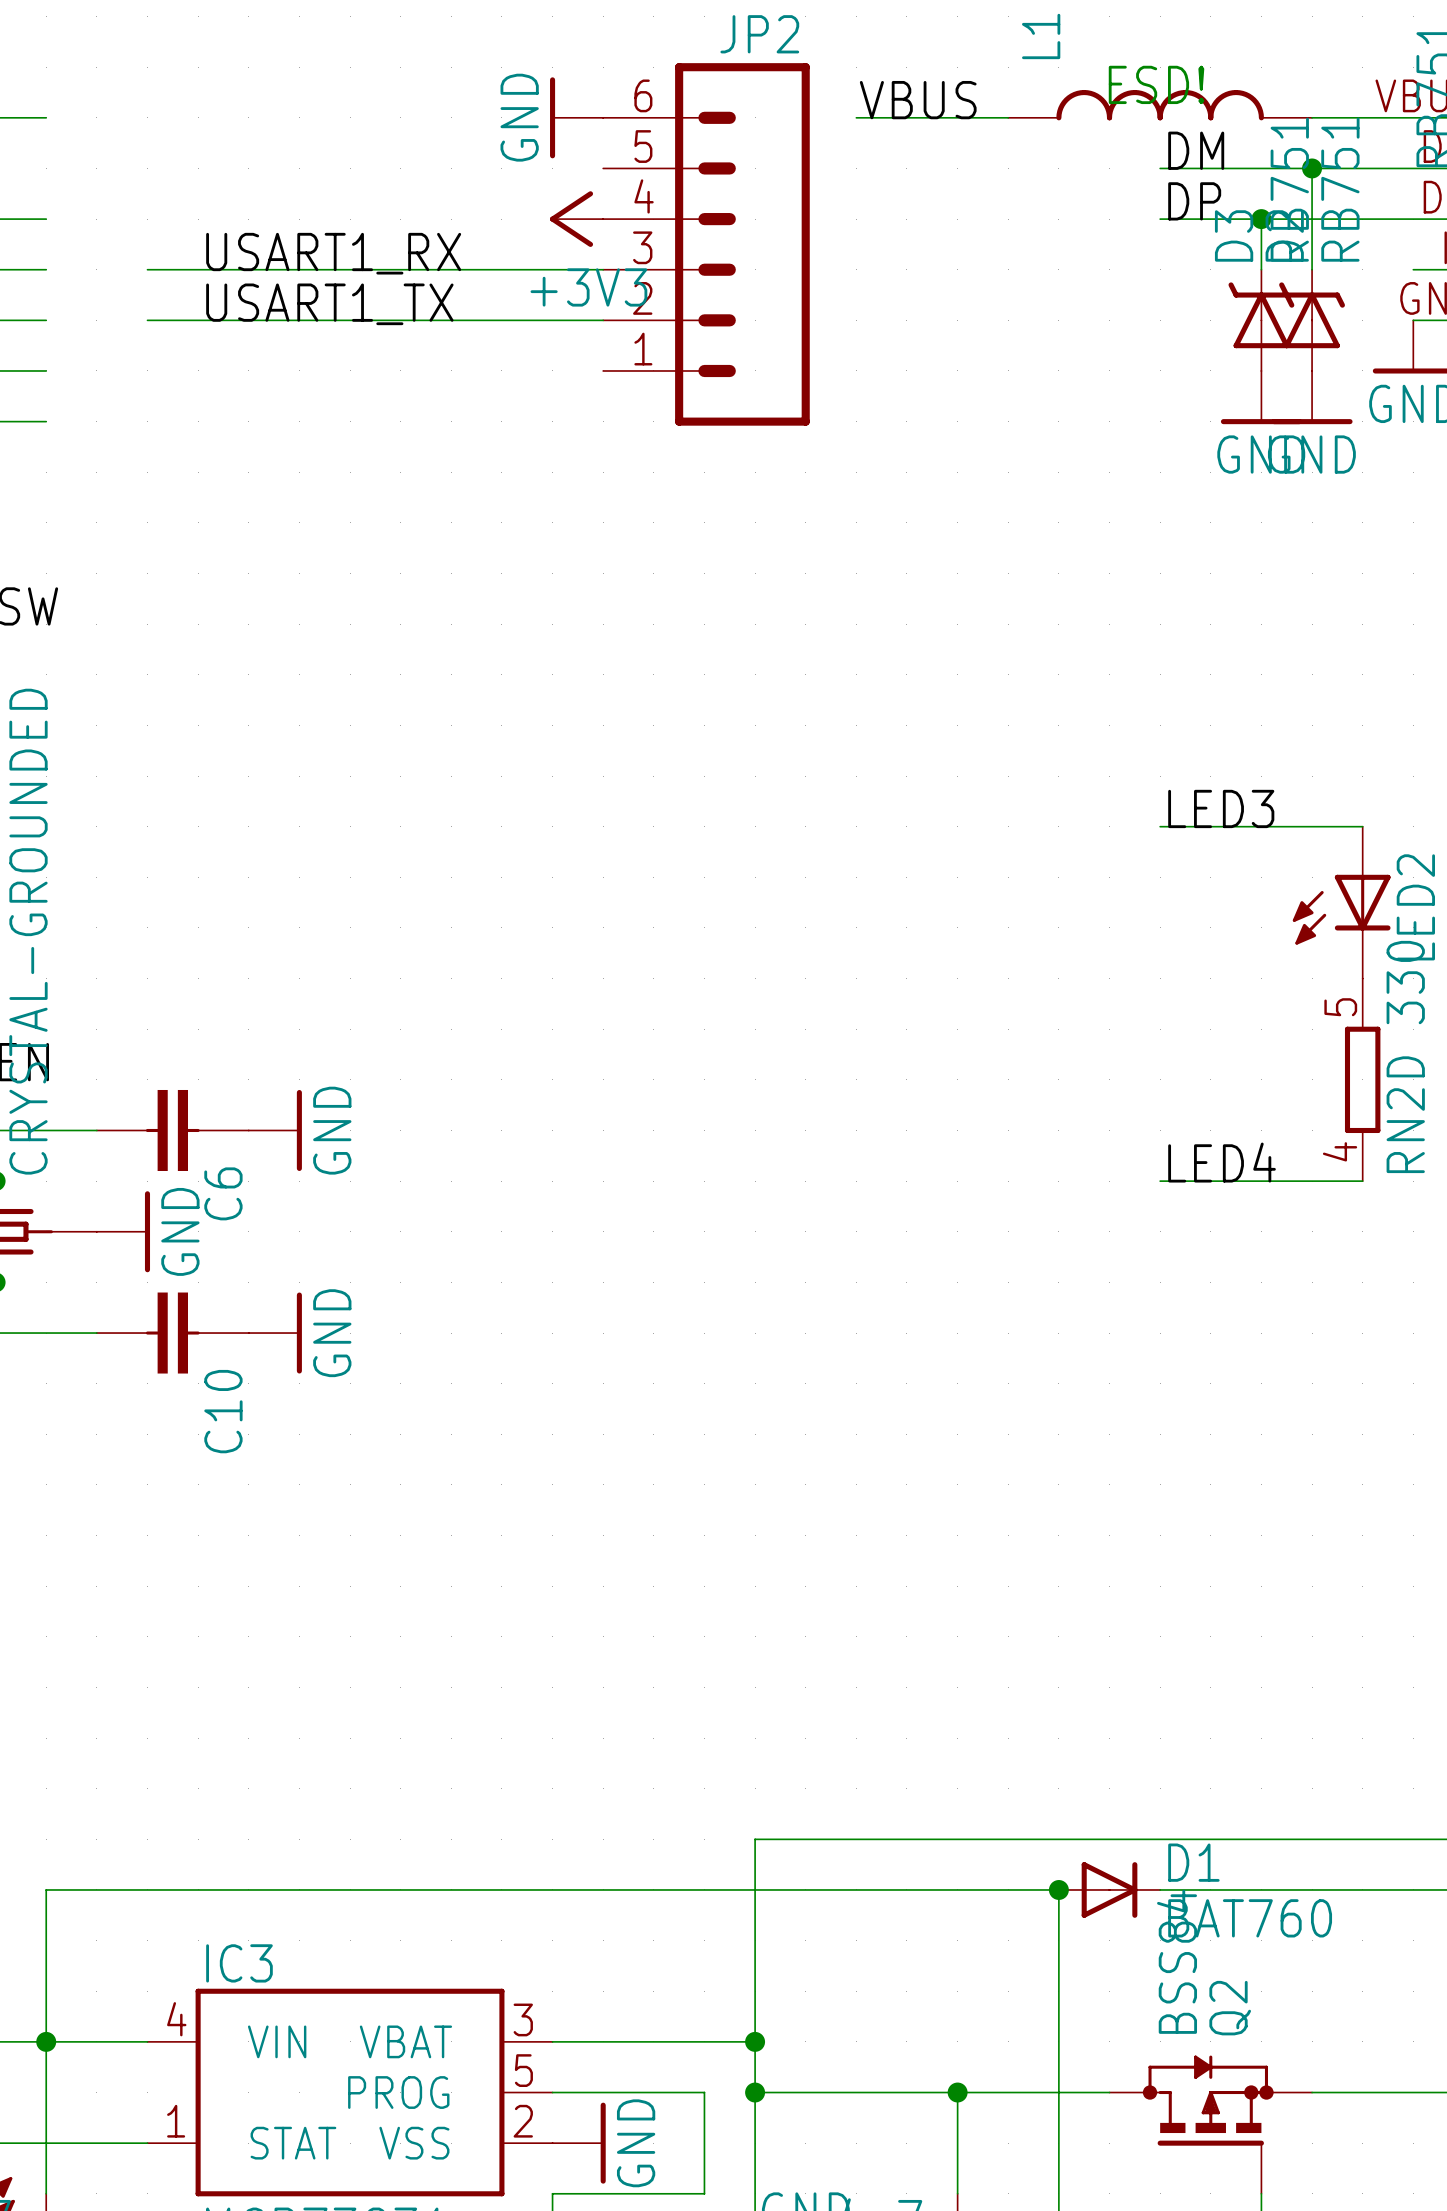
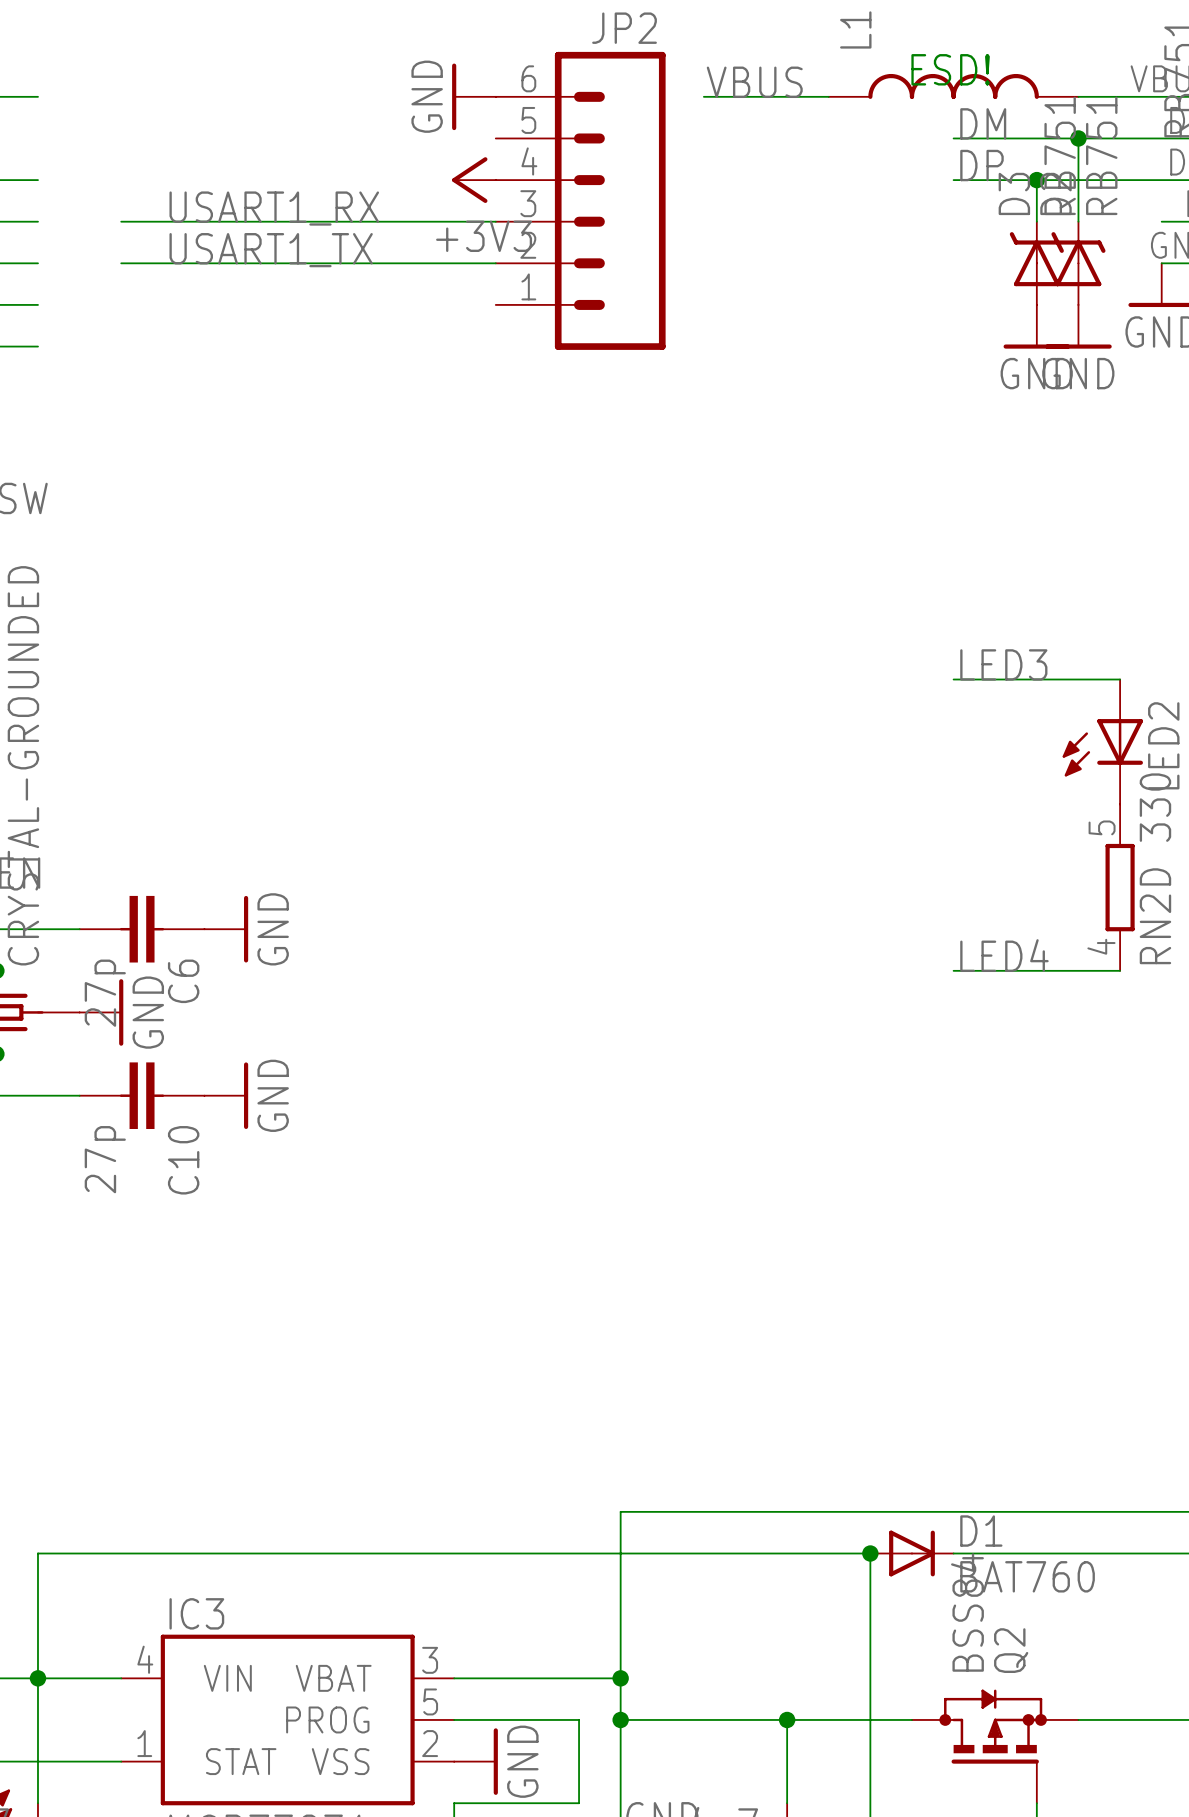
C6 value: none -> 27p (105, 993)
C10 value: none -> 27p (105, 1159)

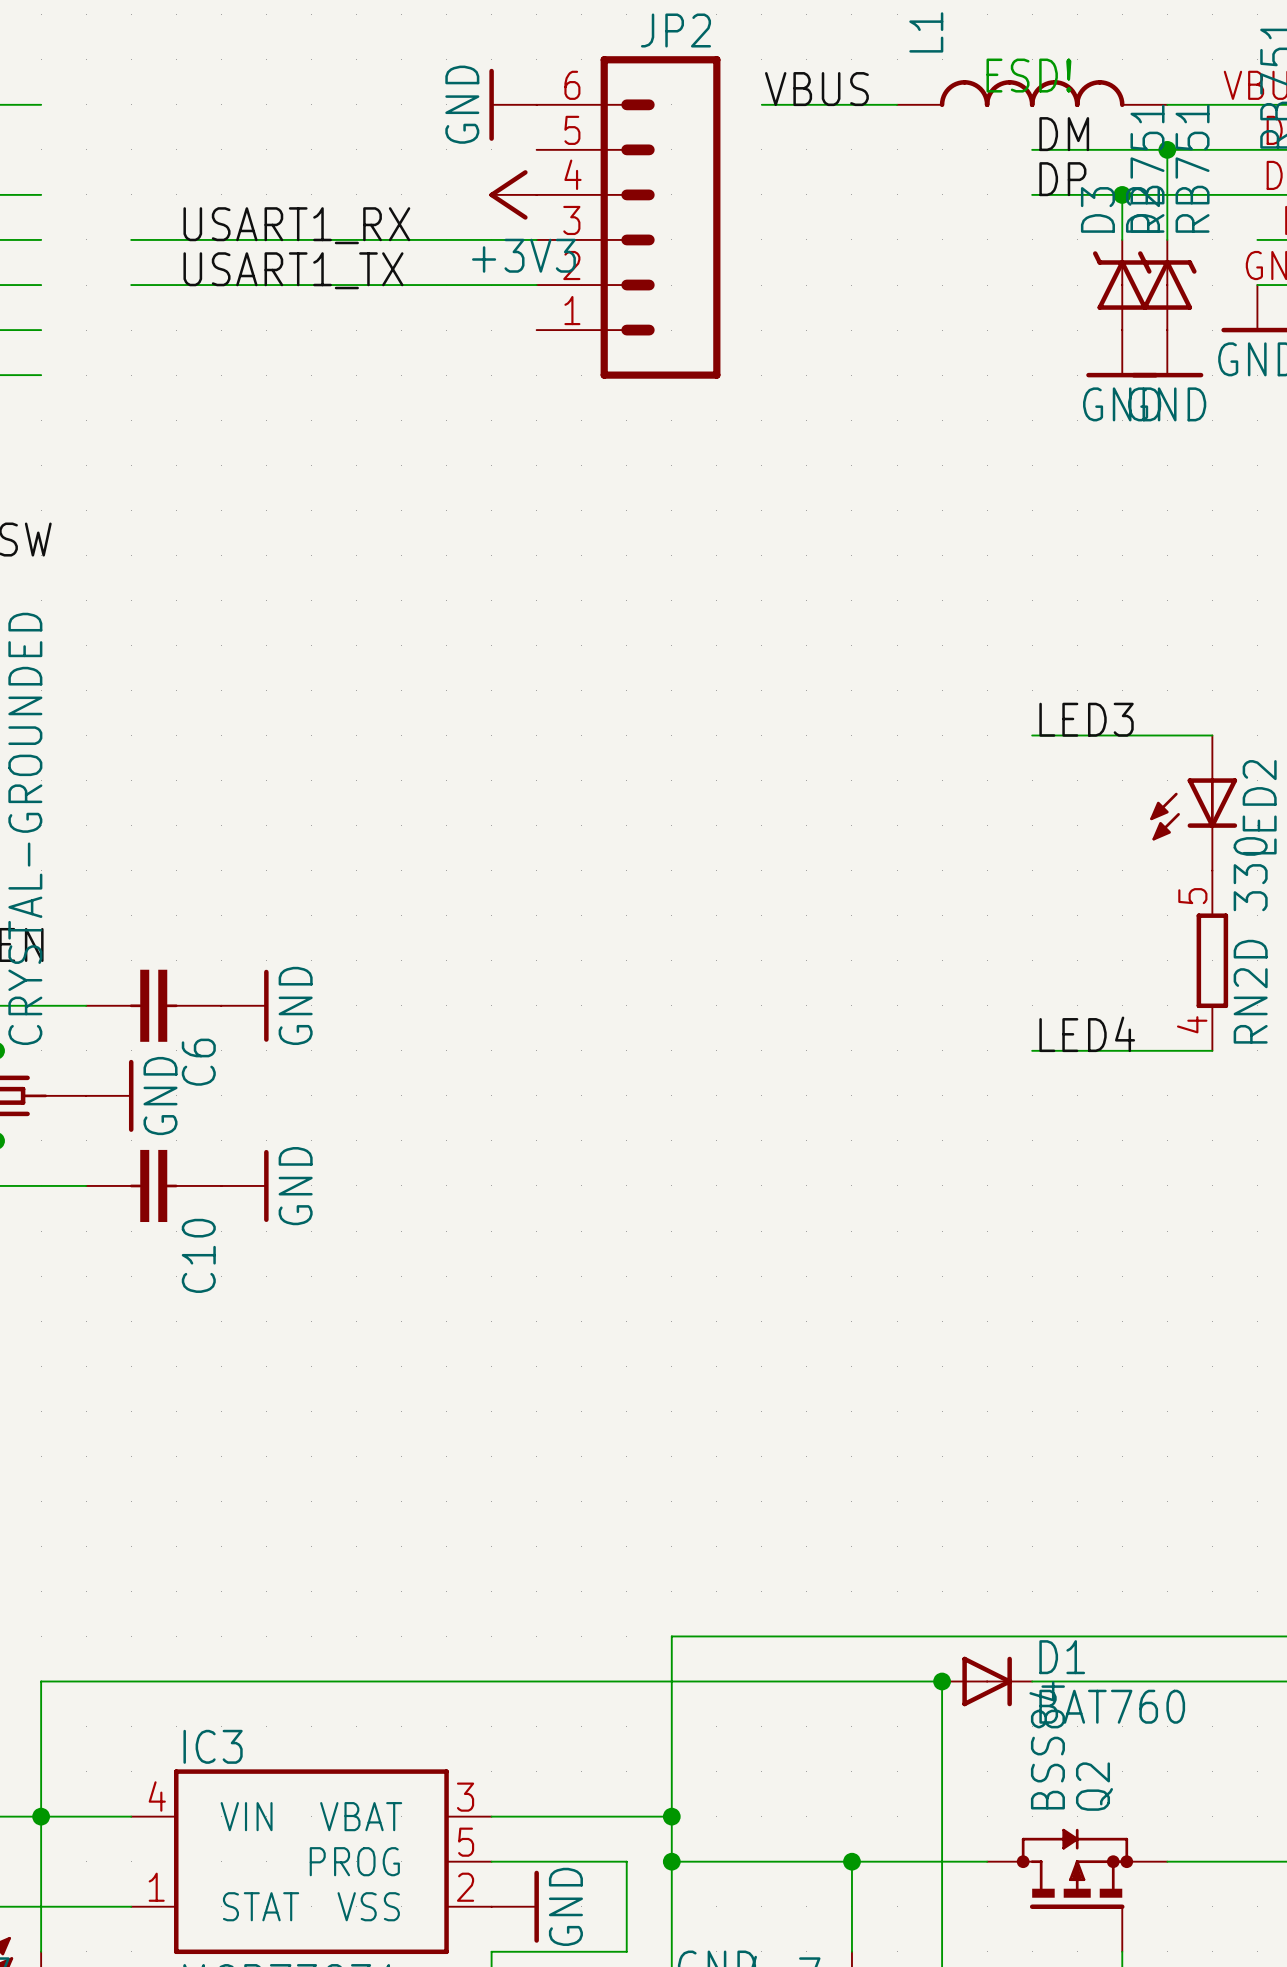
C6 value: 27p (105, 993) -> none
C10 value: 27p (105, 1159) -> none

